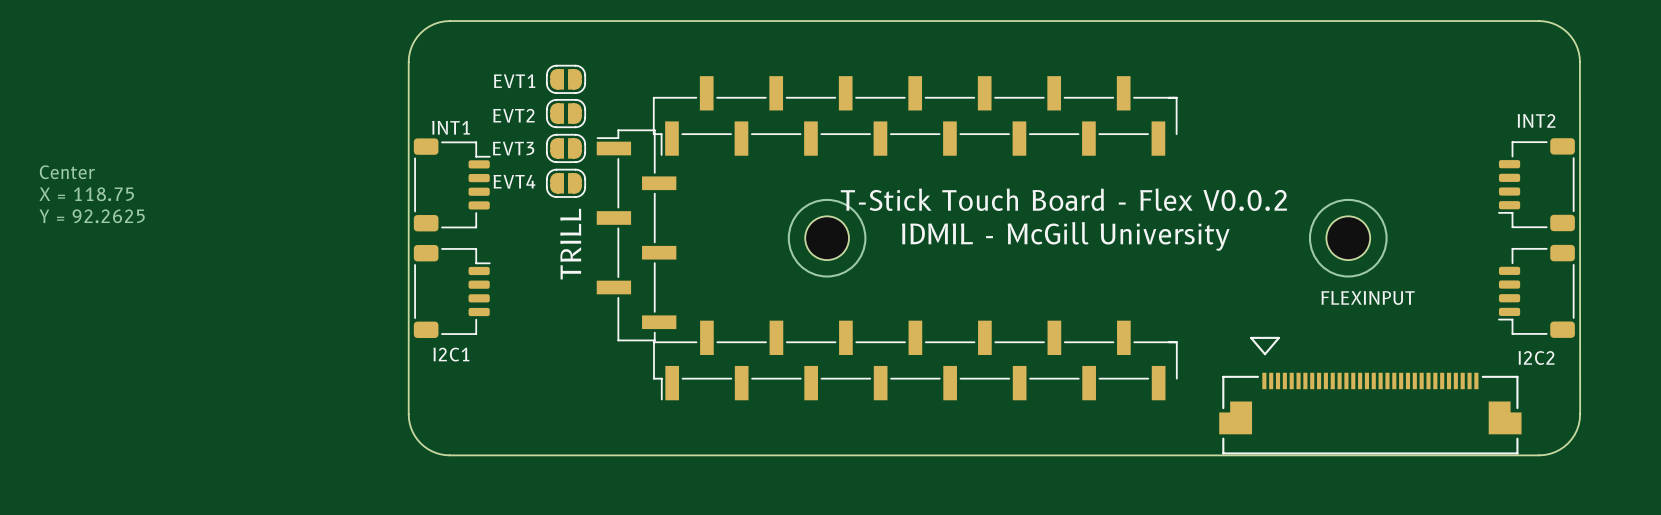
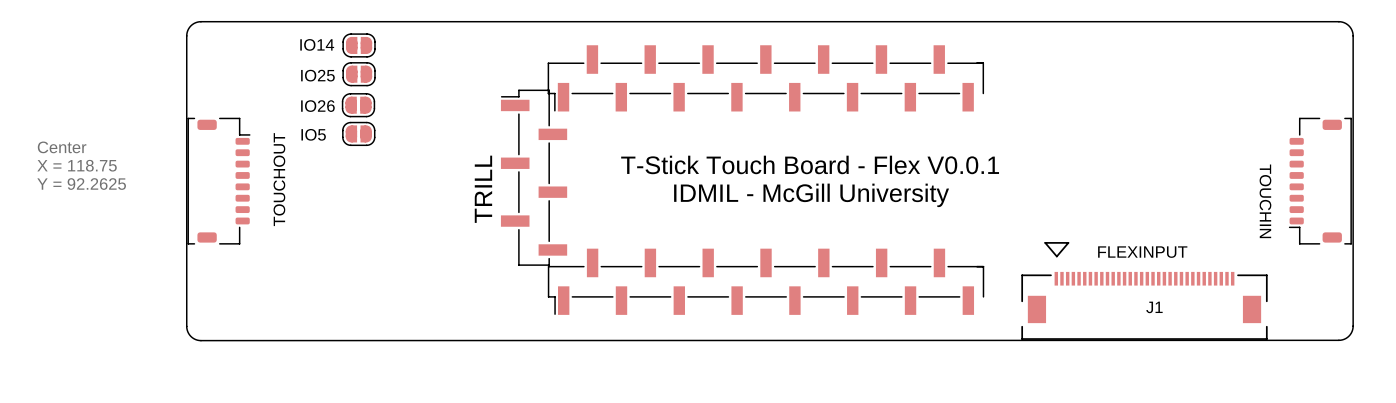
board edge: (449, 21) (434, 24) (420, 33) (411, 46) (408, 62) (408, 418) (412, 432) (417, 439) (424, 446) (436, 453) (449, 455) (1539, 455) (1554, 452) (1568, 443) (1577, 430) (1580, 414) (1579, 57) (1573, 40) (1564, 30) (1552, 23) (1538, 21) -> (378, 21) (200, 21) (193, 23) (188, 28) (186, 35) (186, 326) (188, 333) (193, 338) (200, 340) (1342, 339) (1350, 334) (1353, 326) (1353, 34) (1348, 25) (1340, 21) (1284, 21)
text: none -> IO14 (317, 44)
part: none -> (359, 45)
part: (566, 79) -> none
text: EVT1 (514, 81) -> none
part: none -> (359, 74)
text: none -> IO25 (317, 75)
part: (566, 113) -> none
text: EVT2 (513, 115) -> none
part position: (915, 115) -> (765, 78)
part: none -> (358, 105)
text: none -> IO26 (317, 106)
text: EVT3 (513, 148) -> none
part: (566, 148) -> none
part: none -> (358, 133)
text: none -> IO5 (313, 134)
text: EVT4 (514, 181) -> none
part: (566, 183) -> none
INT1: (452, 184) -> none
INT2: (1536, 184) -> none
text: T-Stick Touch Board - Flex V0.0.2 (1063, 199) -> T-Stick Touch Board - Flex V0.0.1 (810, 164)
part: none -> (218, 181)
part: none -> (1320, 181)
text: none -> TOUCHOUT (279, 179)
text: none -> TOUCHIN (1265, 201)
part position: (636, 235) -> (534, 177)
text position: IDMIL - McGill University (1065, 236) -> IDMIL - McGill University (811, 195)
part: (827, 238) -> none
part: (1348, 238) -> none
text position: TRILL (570, 244) -> TRILL (483, 189)
I2C1: (452, 291) -> none
I2C2: (1536, 291) -> none
J1: none -> (1144, 290)
part position: (915, 360) -> (766, 281)
part: (1370, 395) -> none

